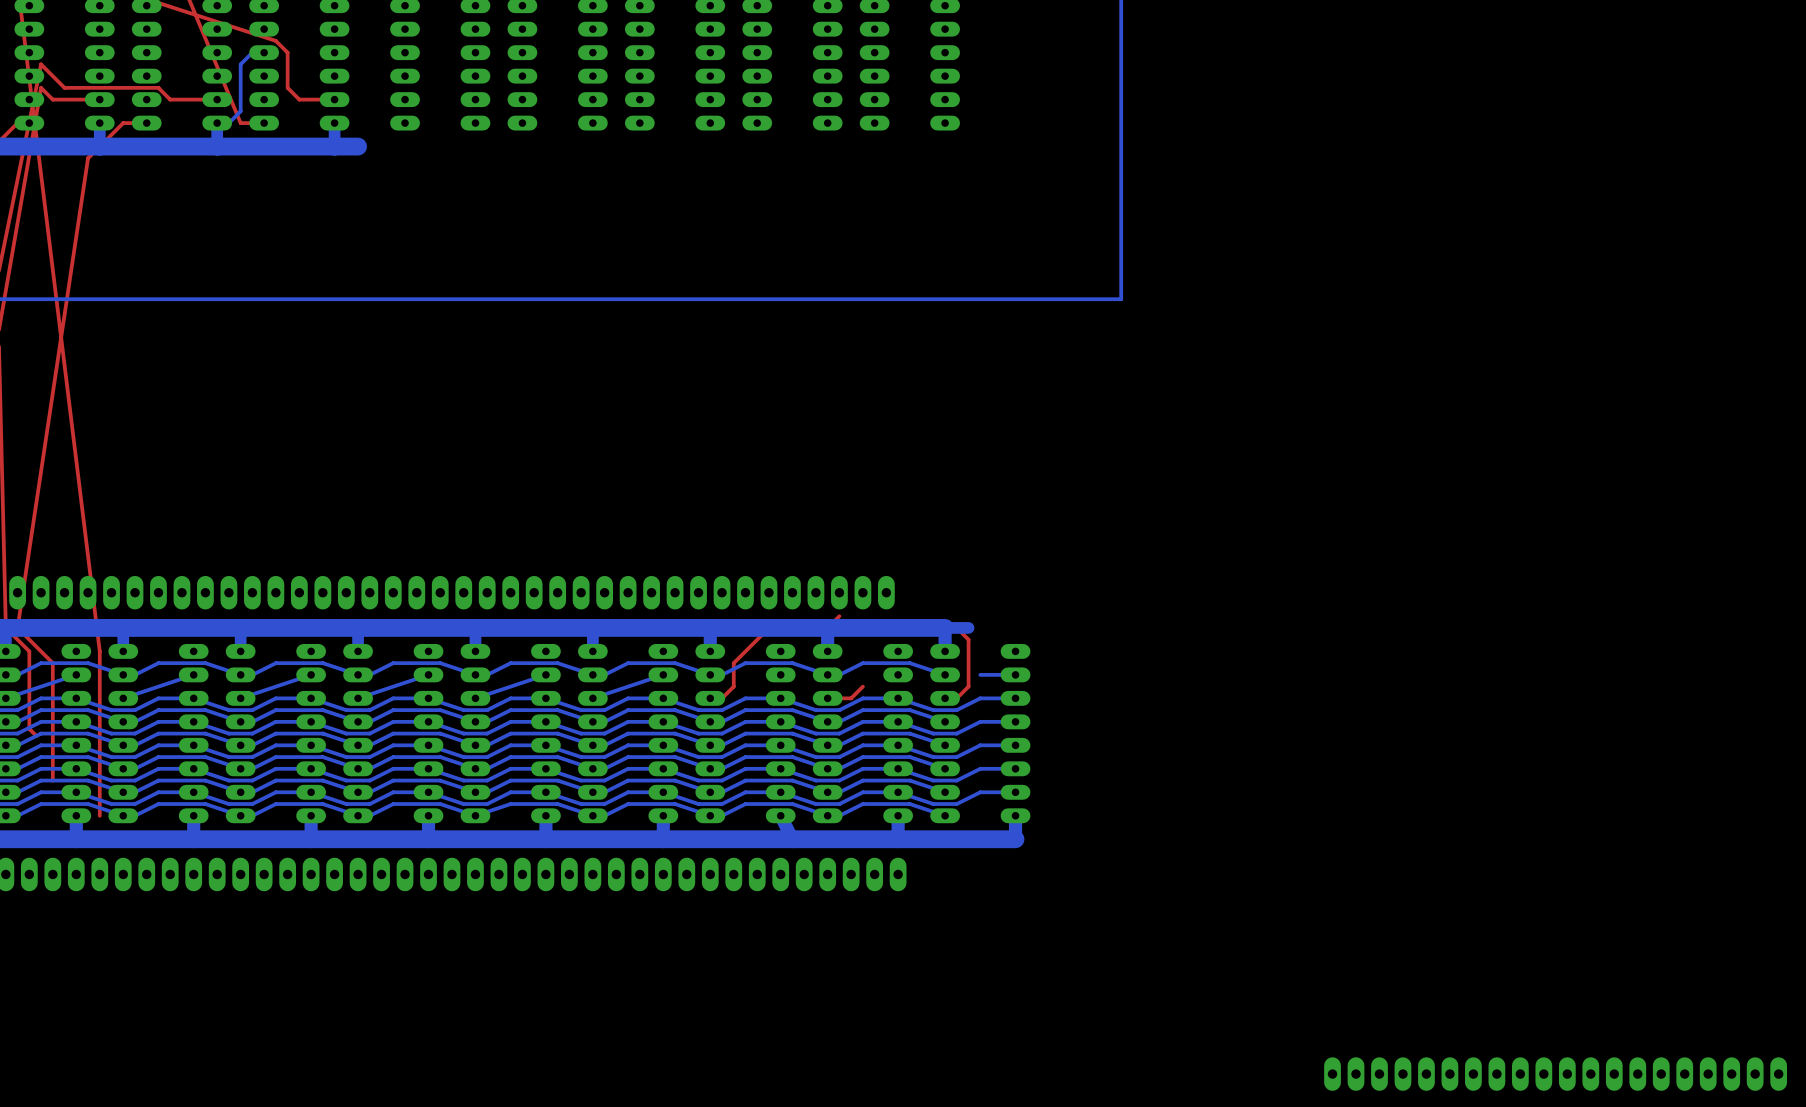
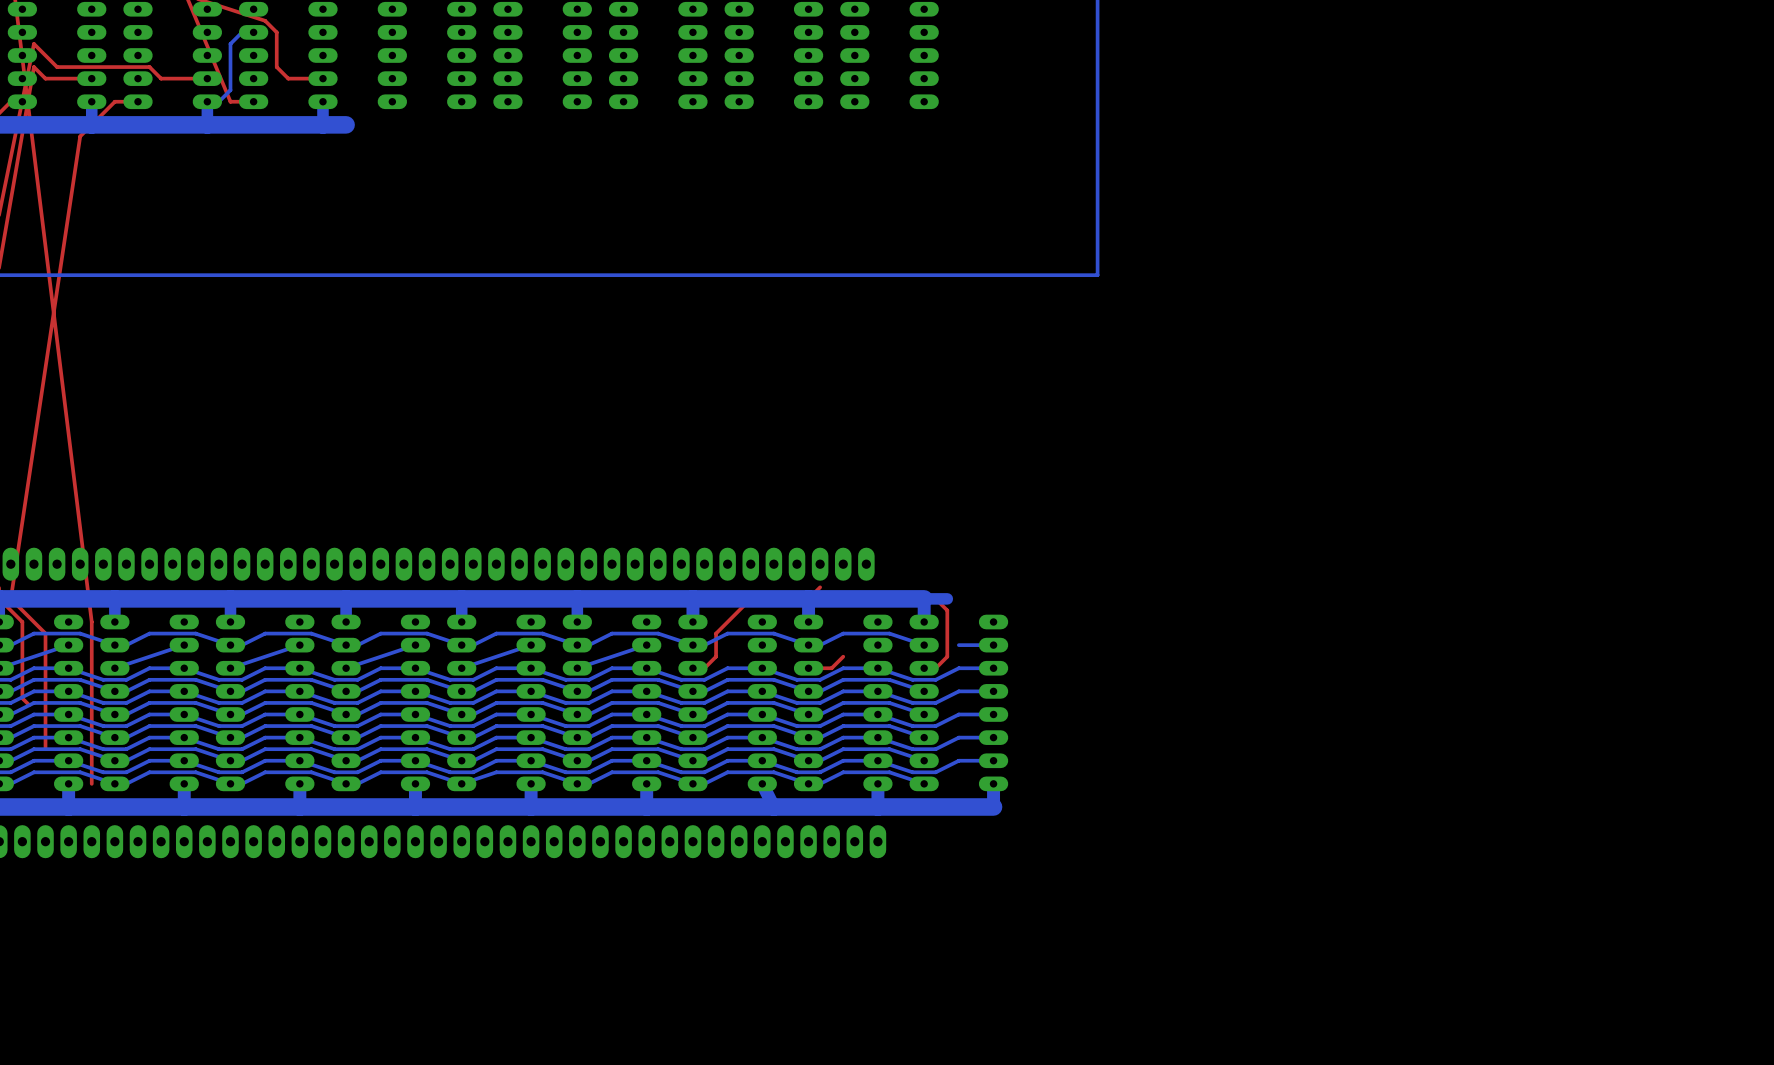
part: (1555, 1074) -> none

